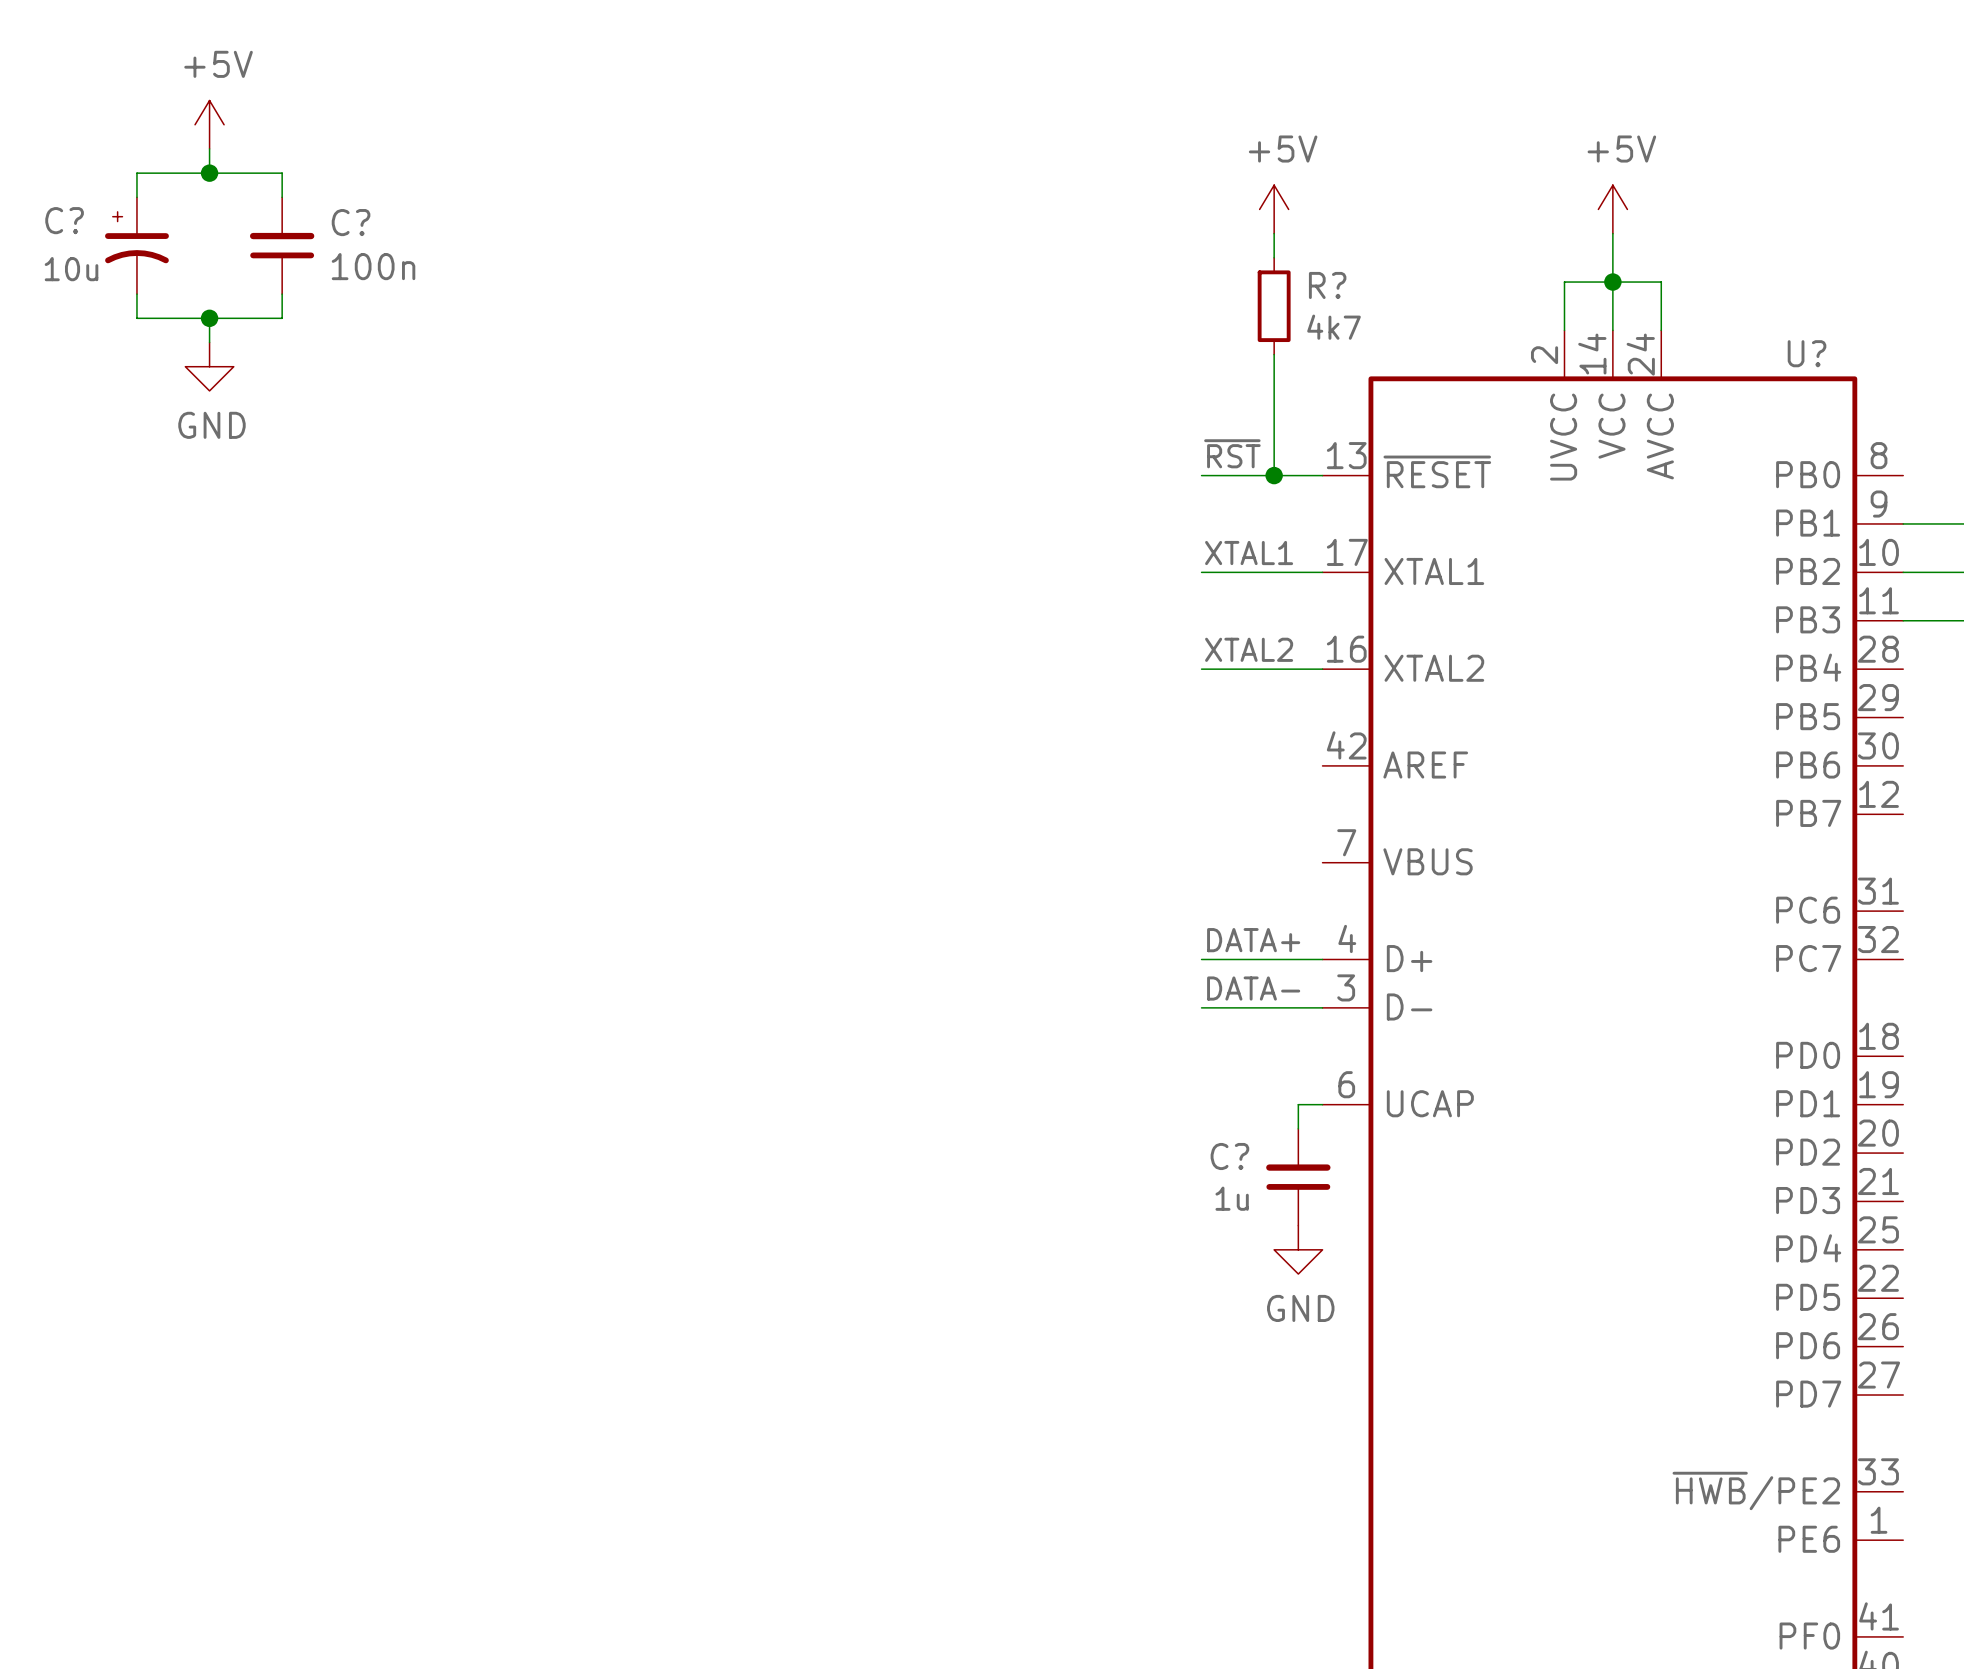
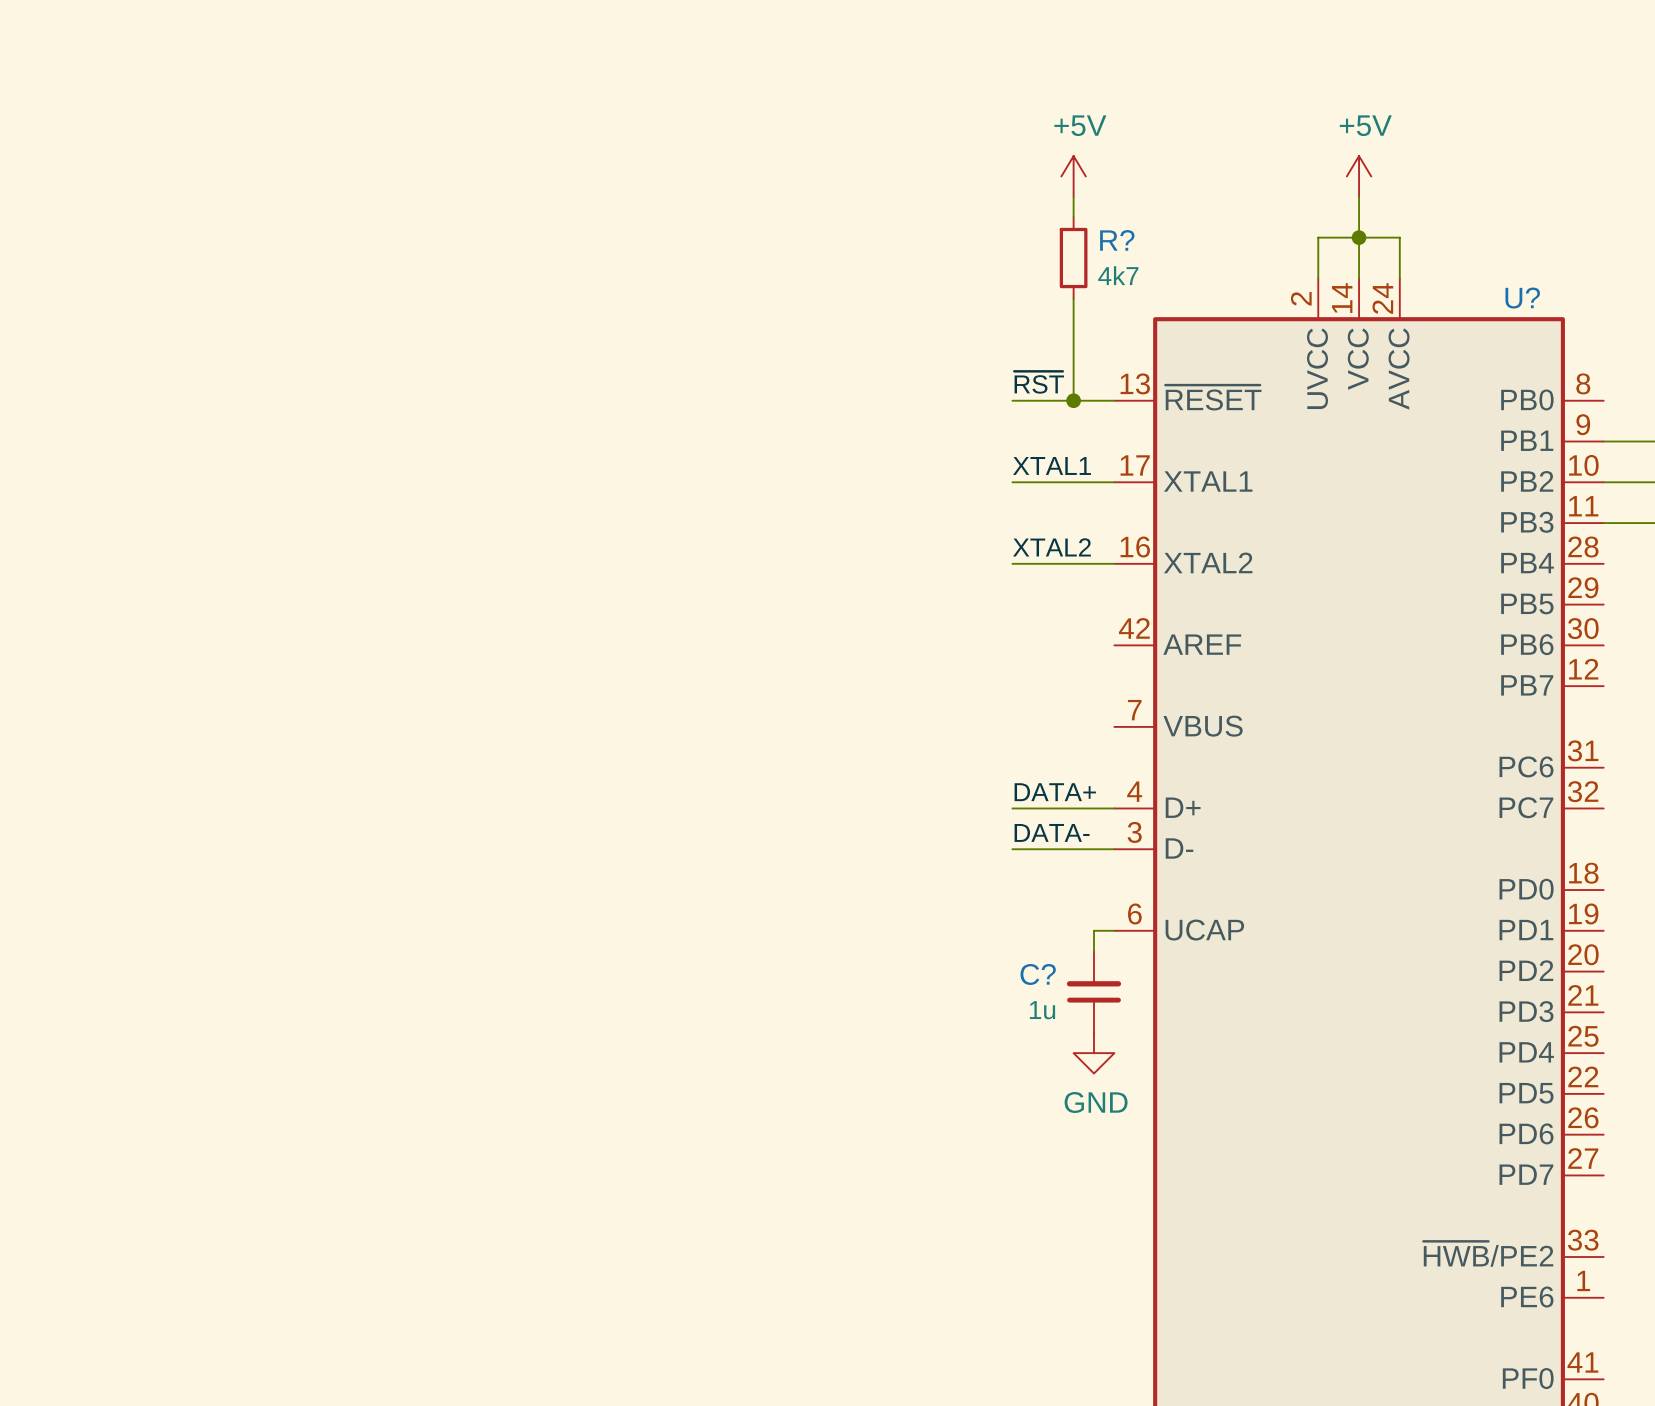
power symbol: +5V (209, 124) -> none
wire: (209, 148) (209, 173) -> none
junction: (209, 173) -> none
wire: (136, 197) (136, 173) (282, 173) (282, 197) -> none
C?: 10u (136, 245) -> none
C?: 100n (282, 245) -> none
wire: (136, 294) (136, 318) (282, 318) (282, 294) -> none
wire: (209, 318) (209, 342) -> none
junction: (209, 318) -> none
power symbol: GND (209, 366) -> none

